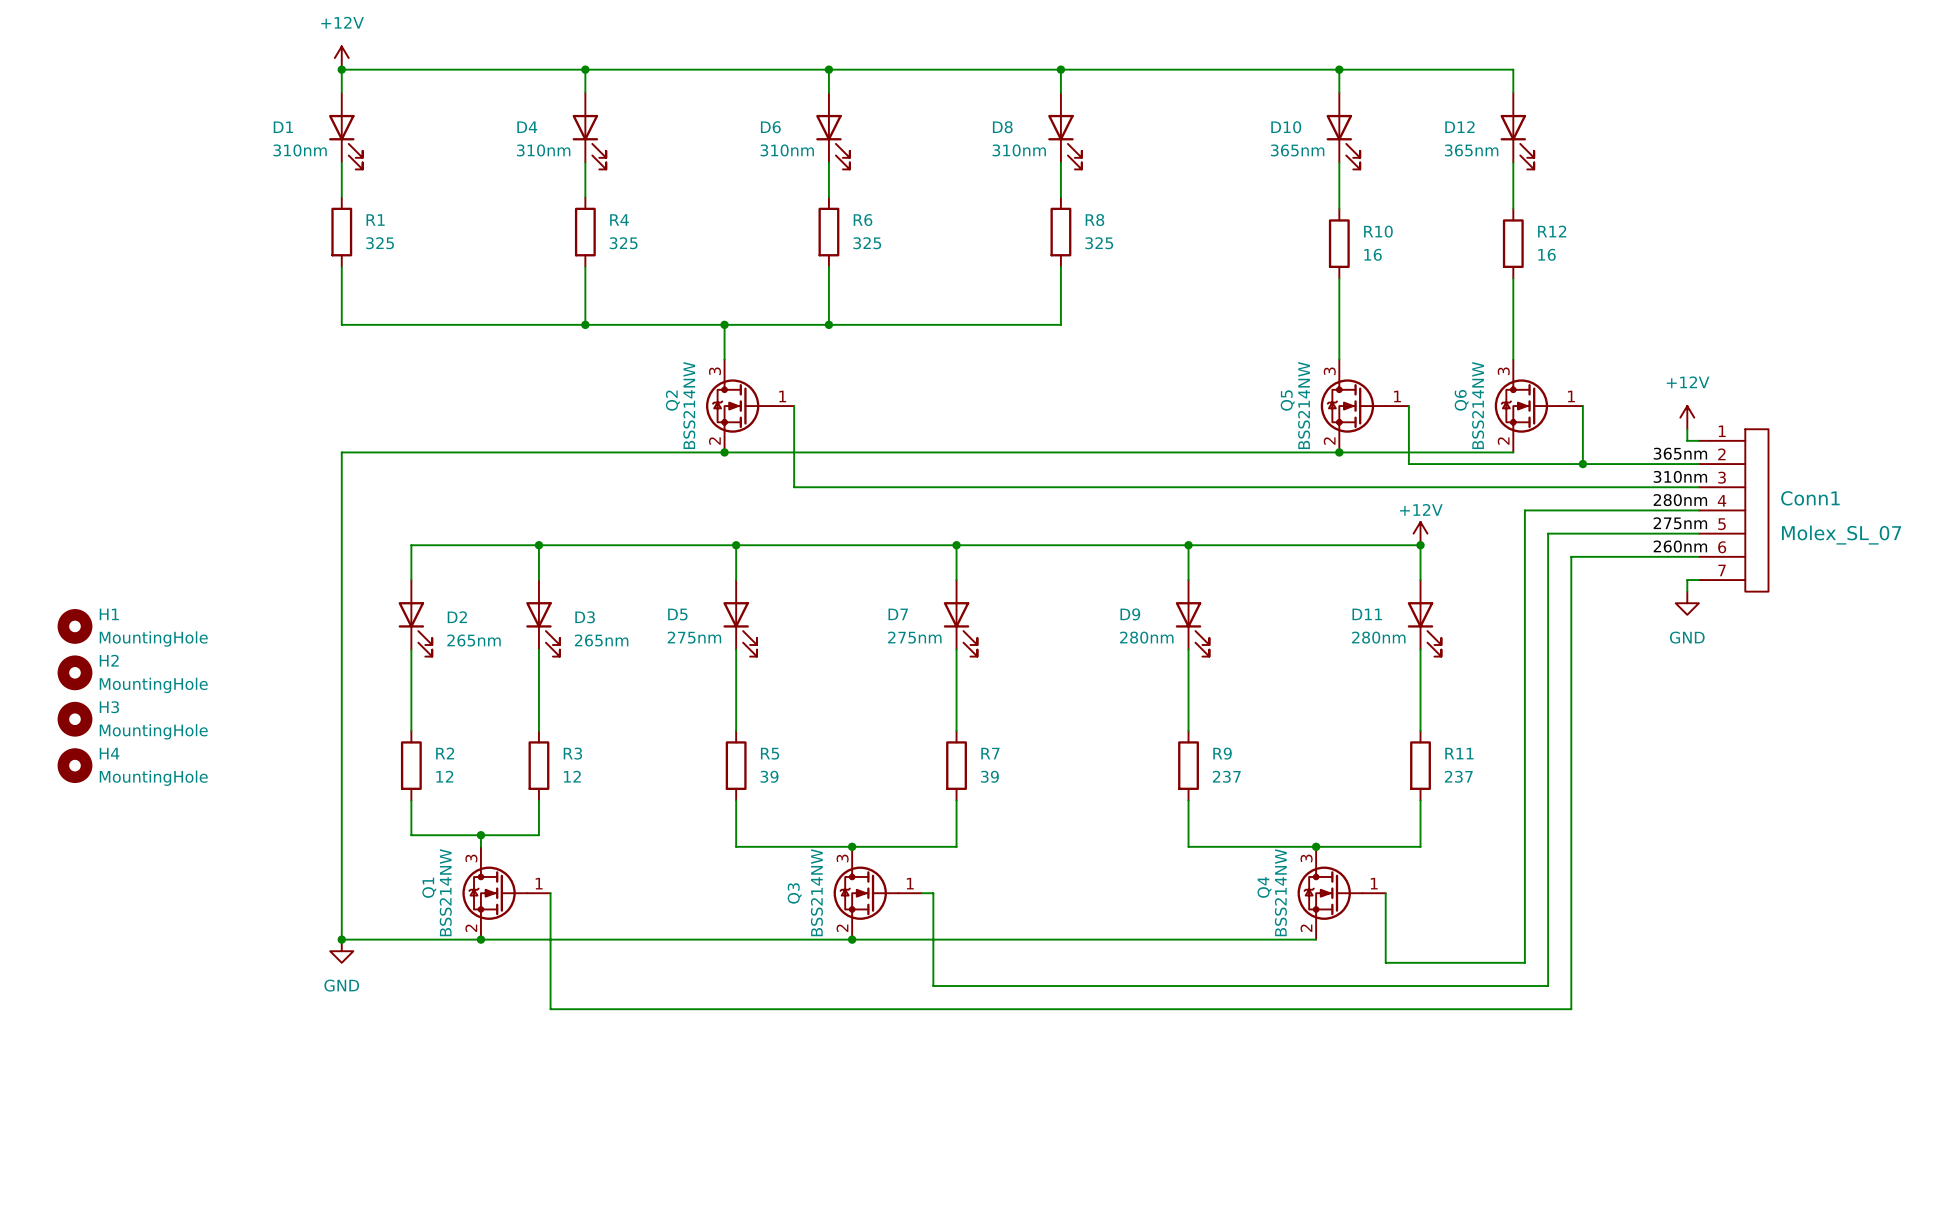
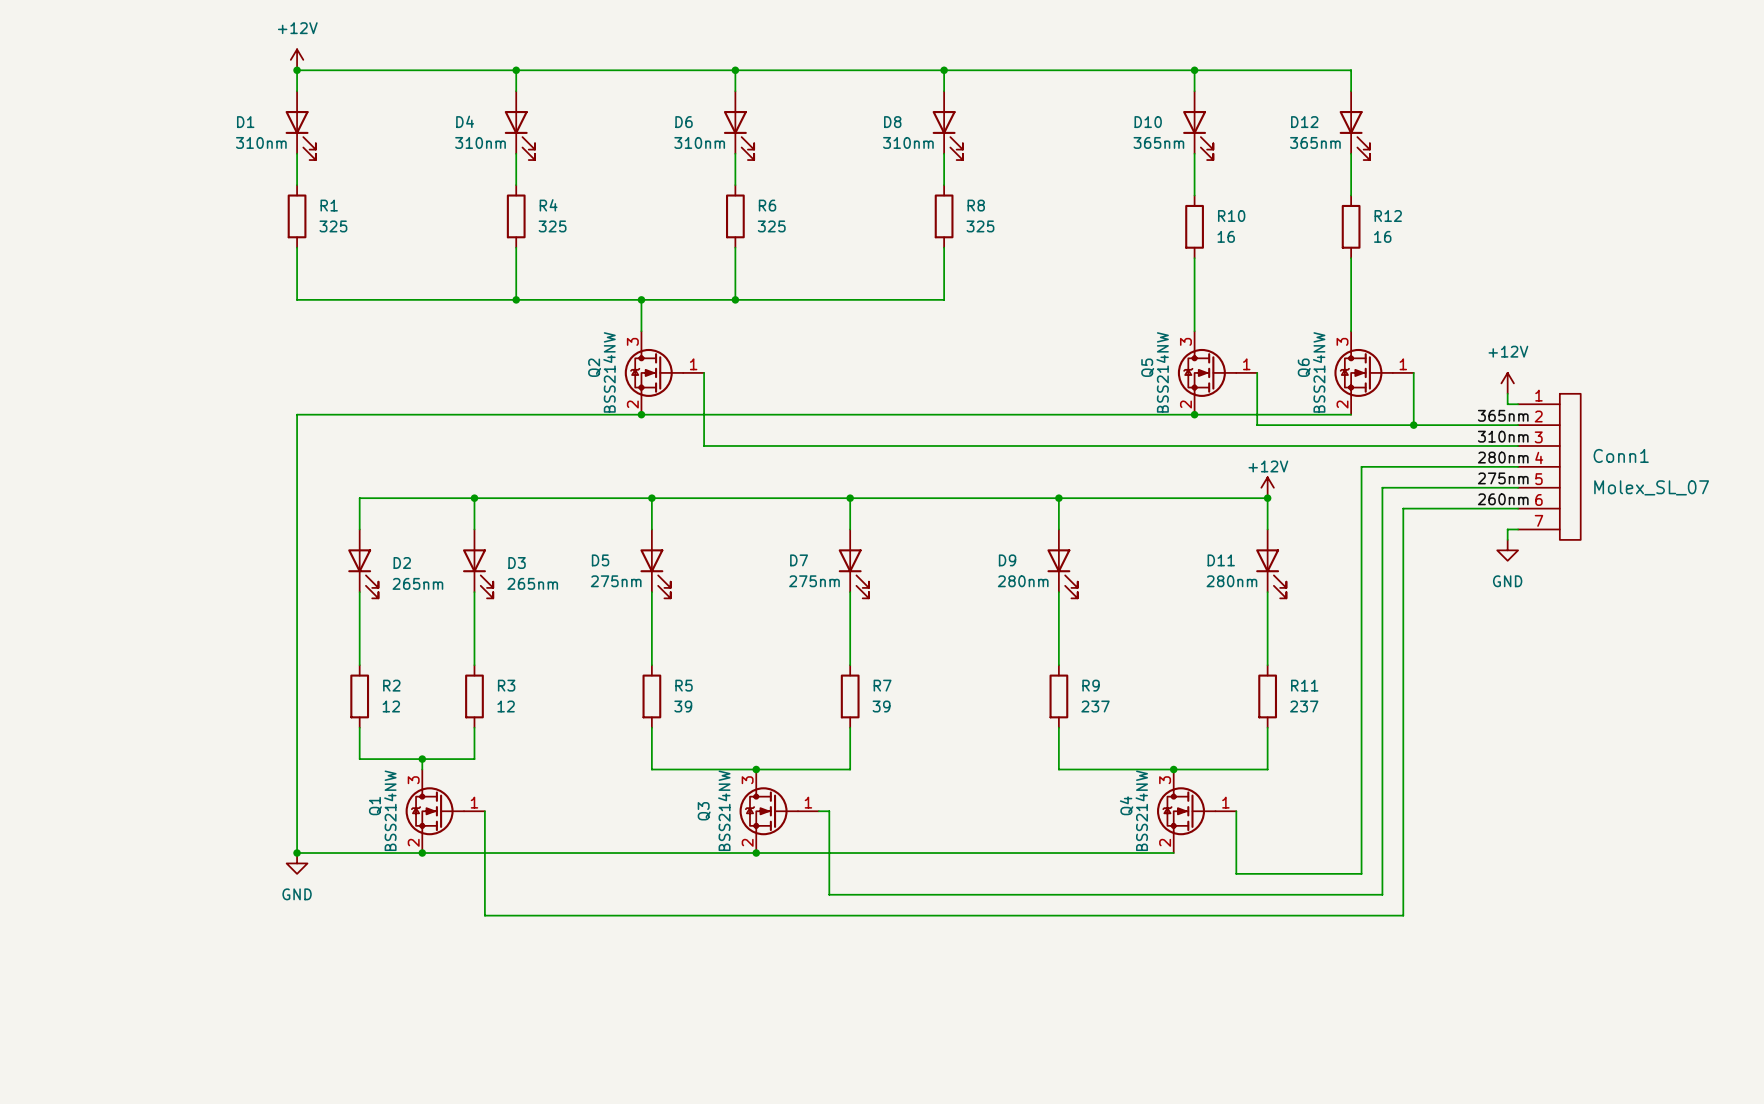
H1: MountingHole (74, 626) -> none
H2: MountingHole (74, 672) -> none
H3: MountingHole (74, 719) -> none
H4: MountingHole (74, 765) -> none

